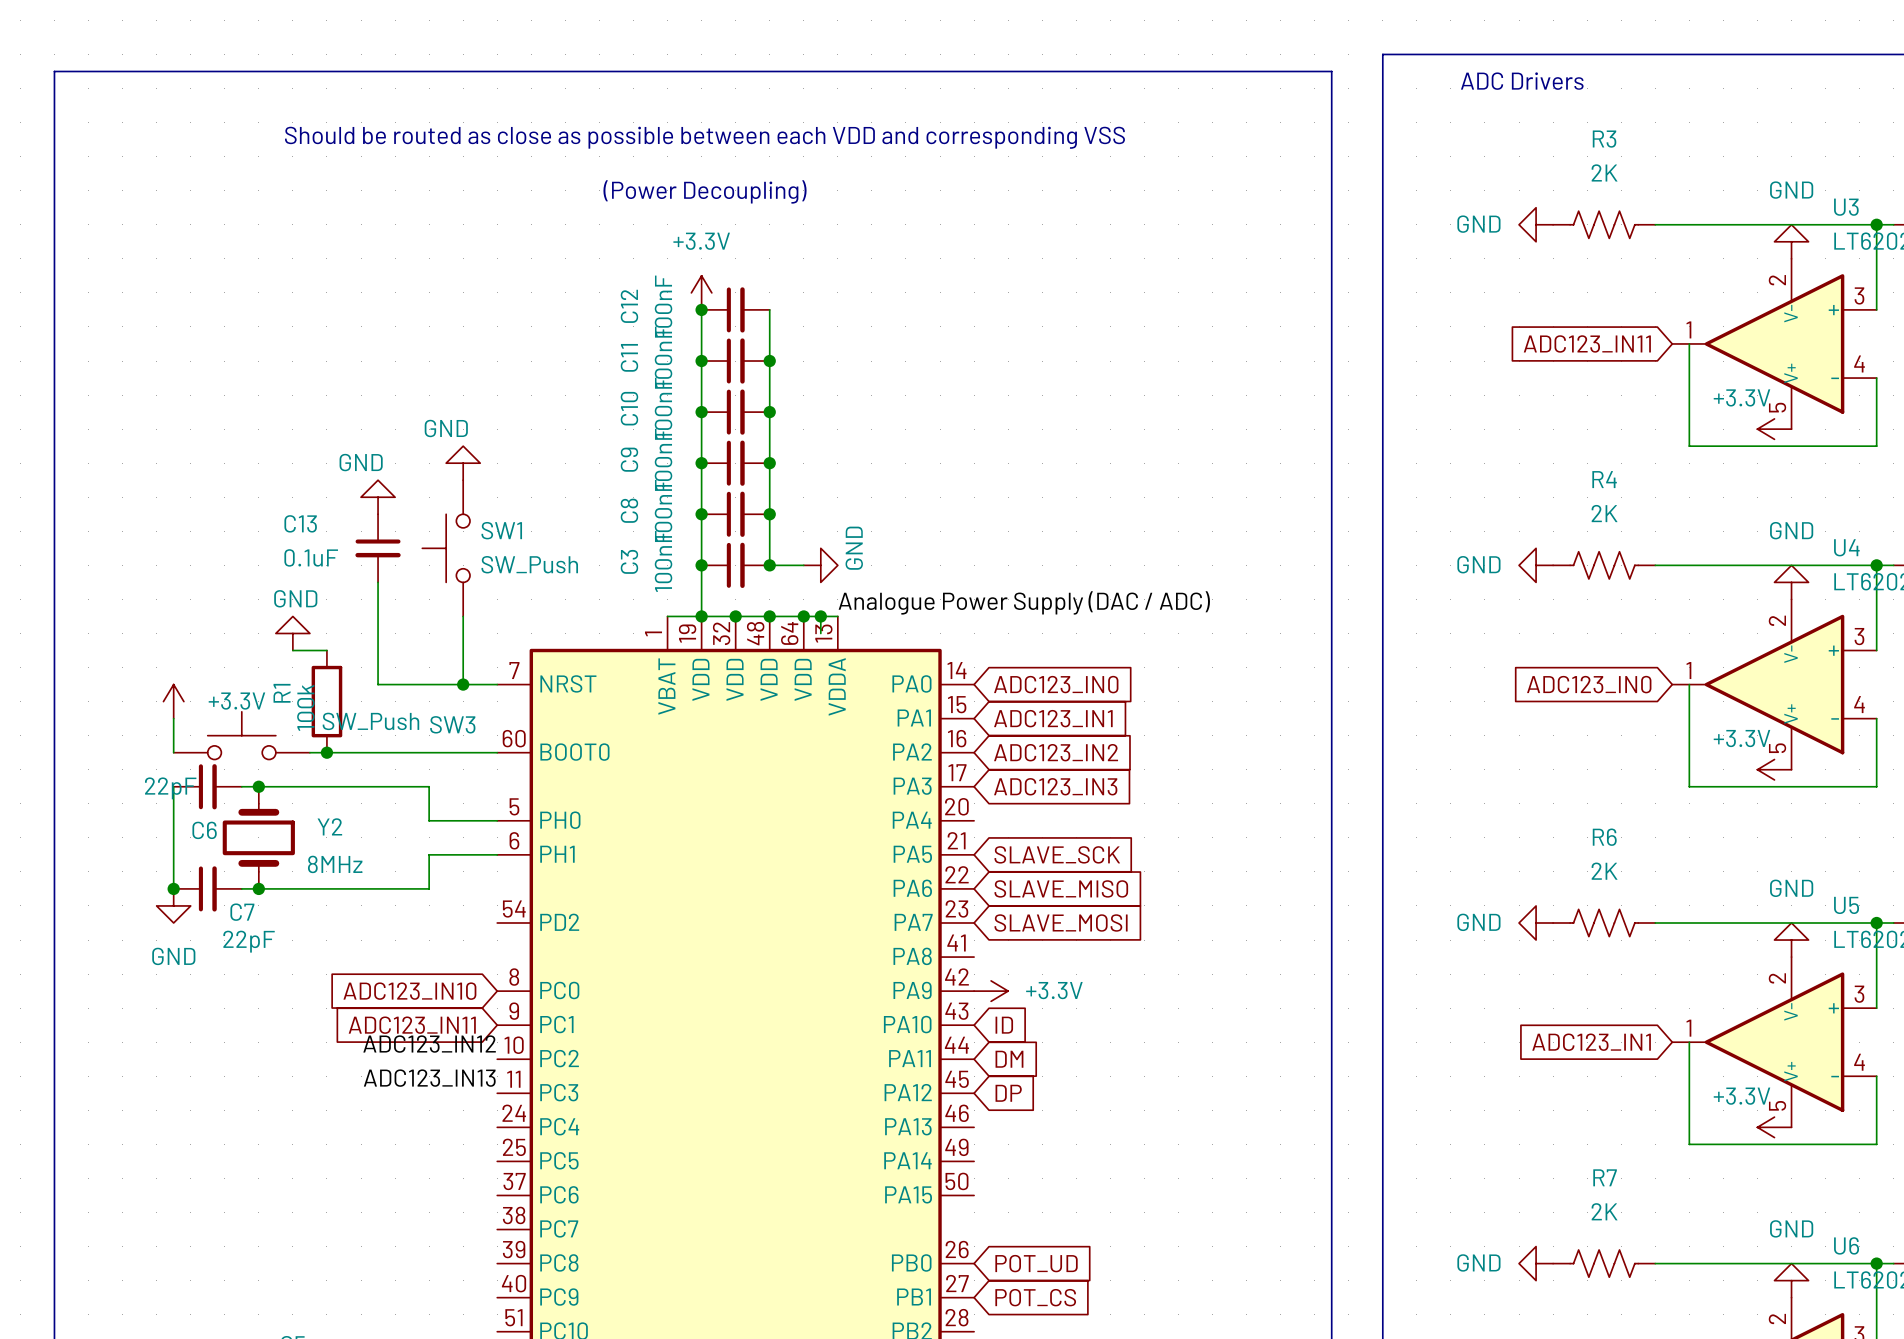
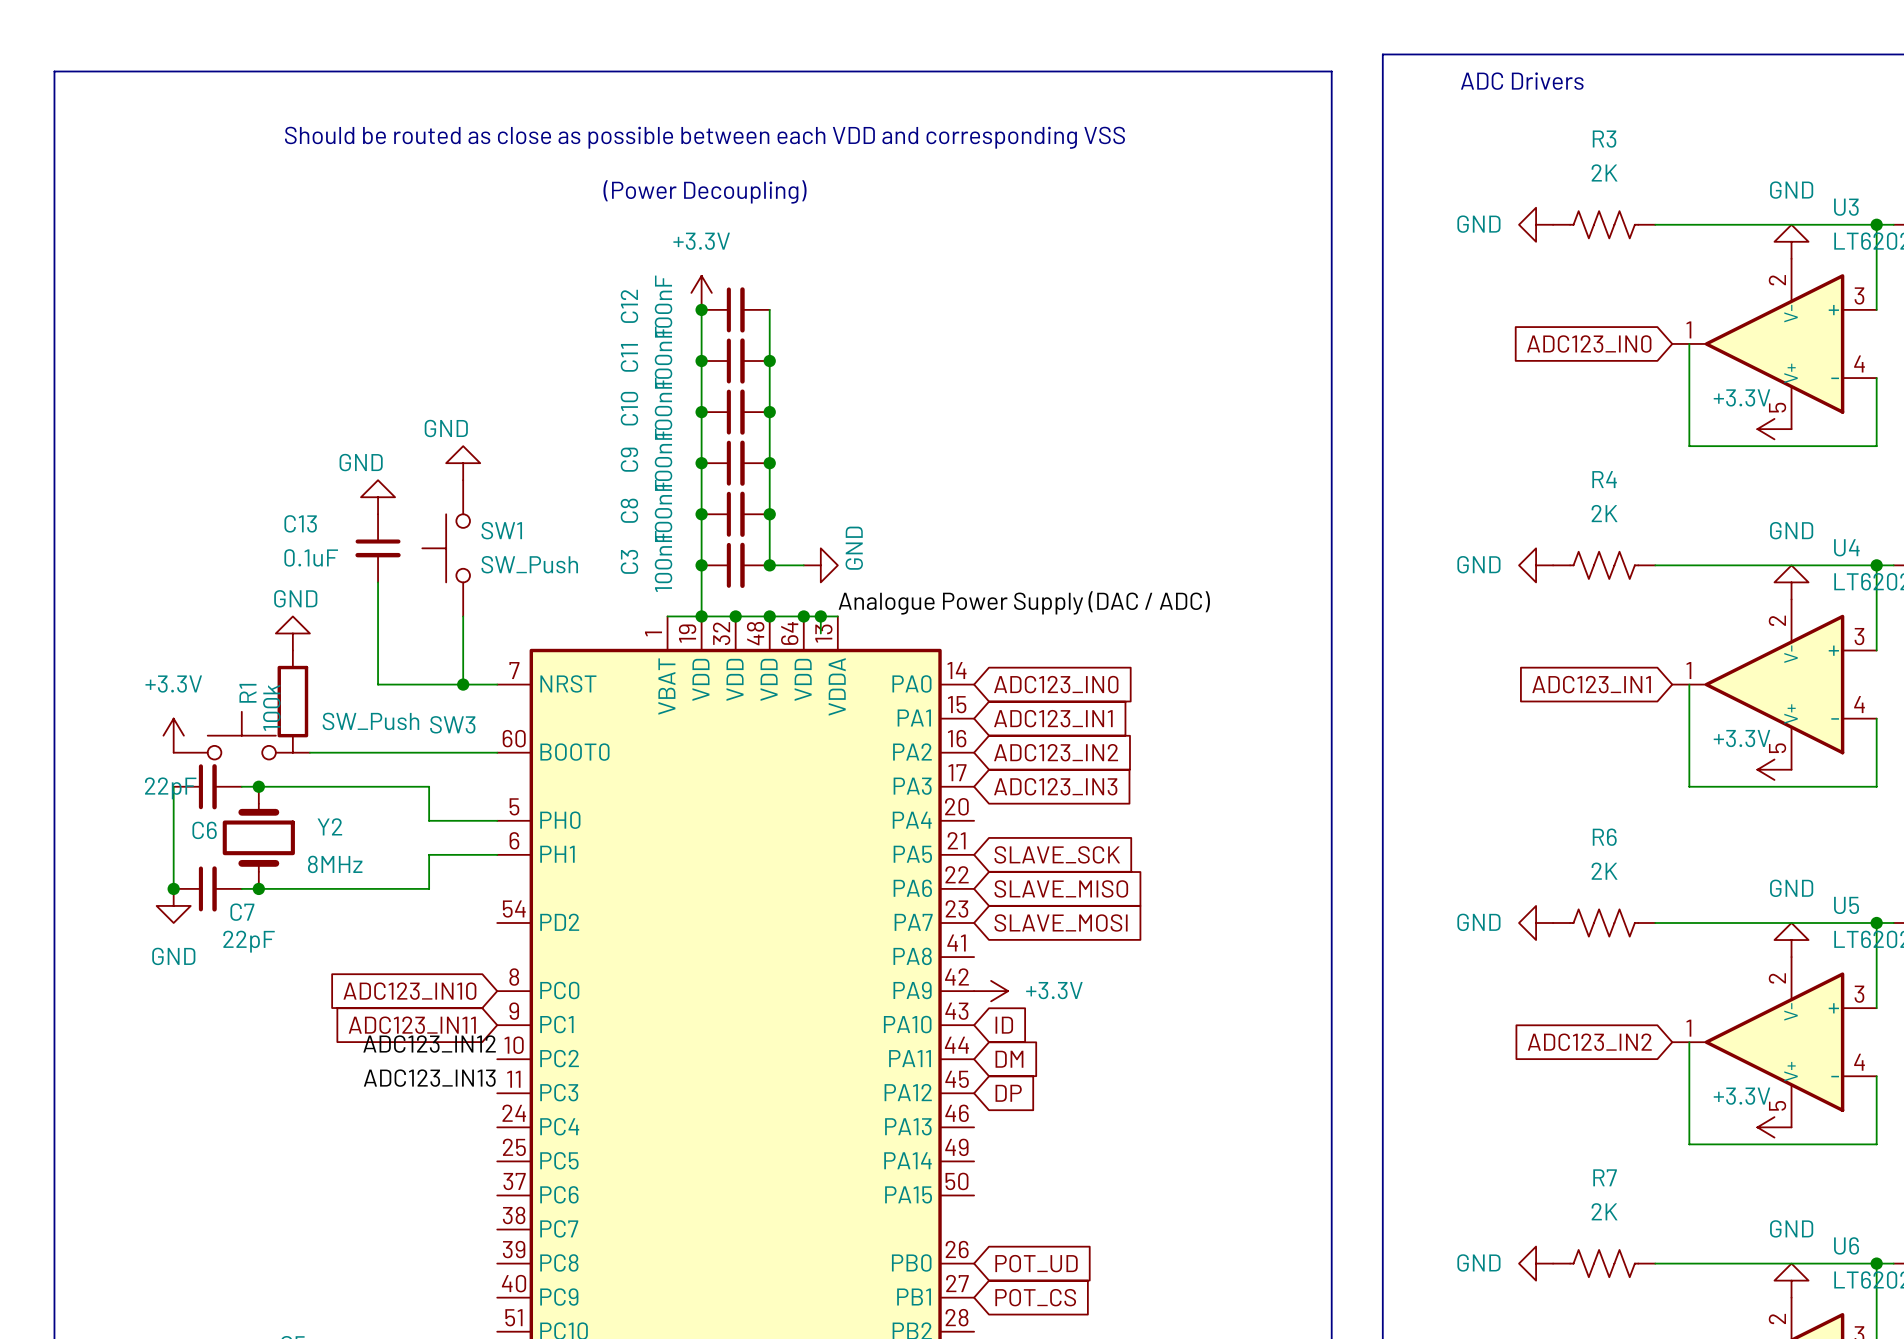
global label: ADC123_IN11 (1587, 343) -> ADC123_IN0 (1589, 343)
wire: (292, 650) (326, 650) -> none
global label: ADC123_IN0 (1589, 684) -> ADC123_IN1 (1591, 684)
power symbol position: +3.3V (173, 701) -> +3.3V (173, 735)
power symbol text position: +3.3V (236, 701) -> +3.3V (173, 684)
R1 position: (326, 701) -> (292, 701)
junction: (326, 752) -> none
global label: ADC123_IN1 (1591, 1042) -> ADC123_IN2 (1589, 1042)

